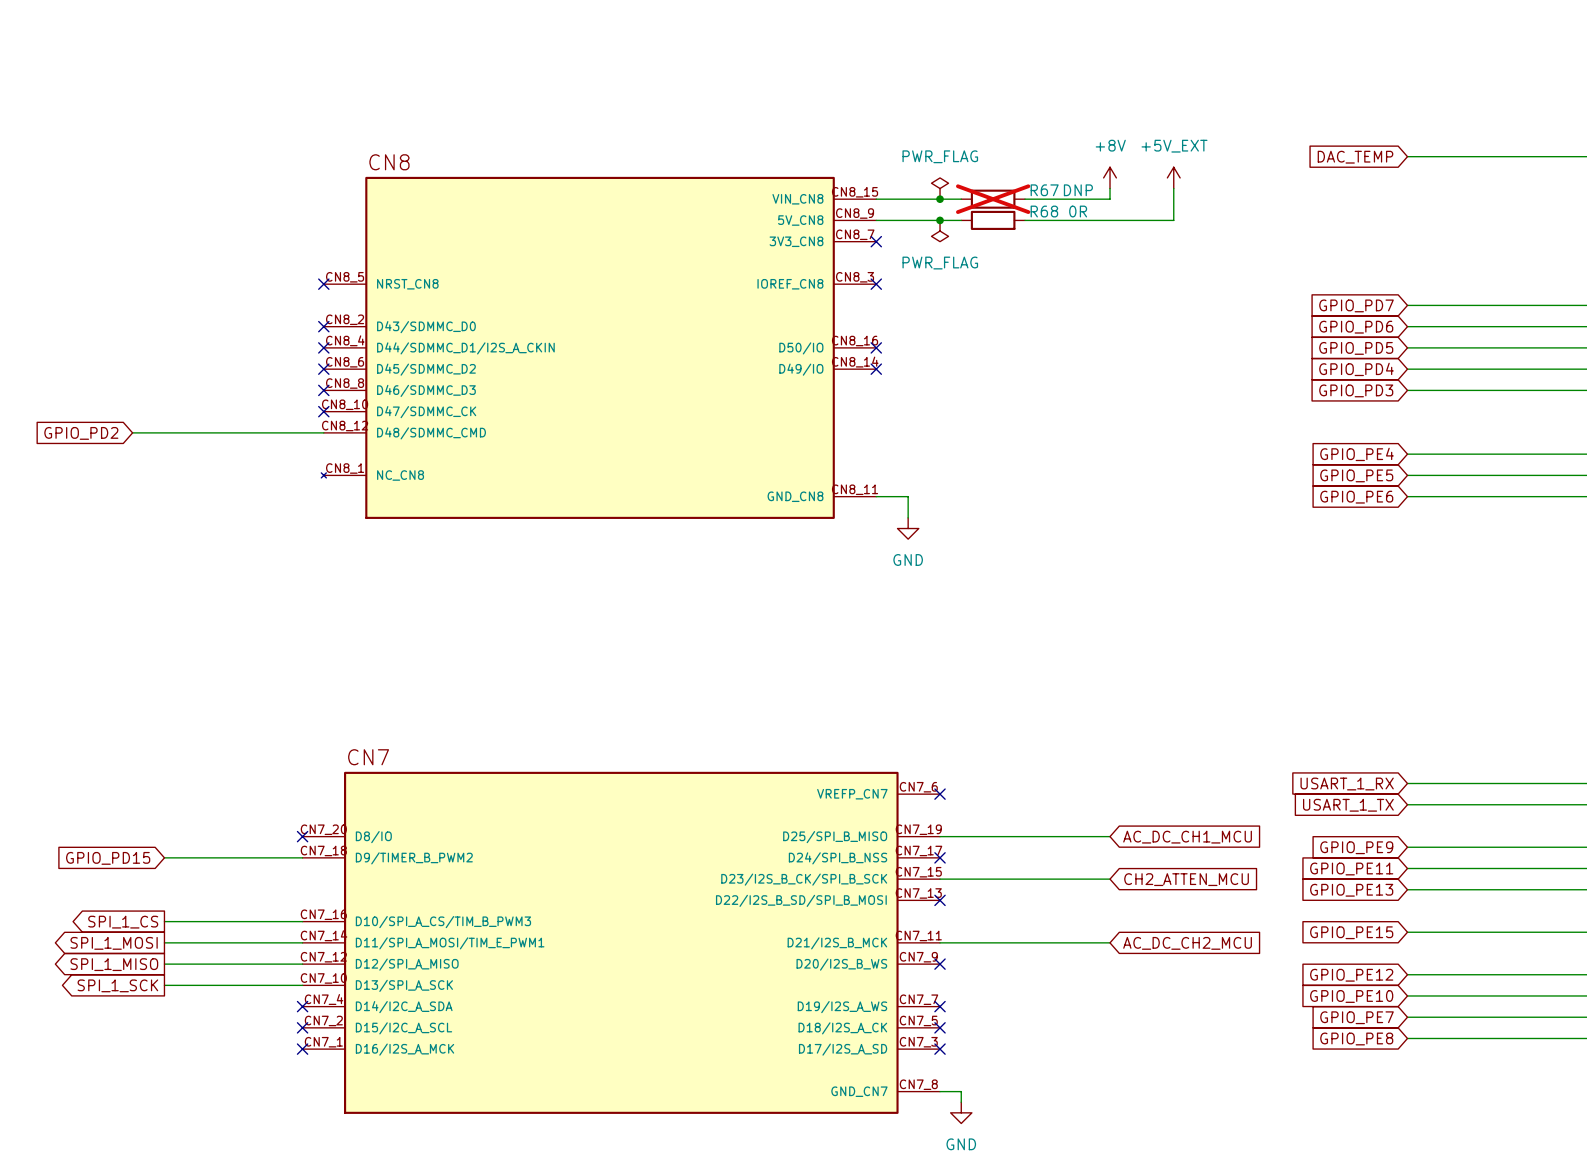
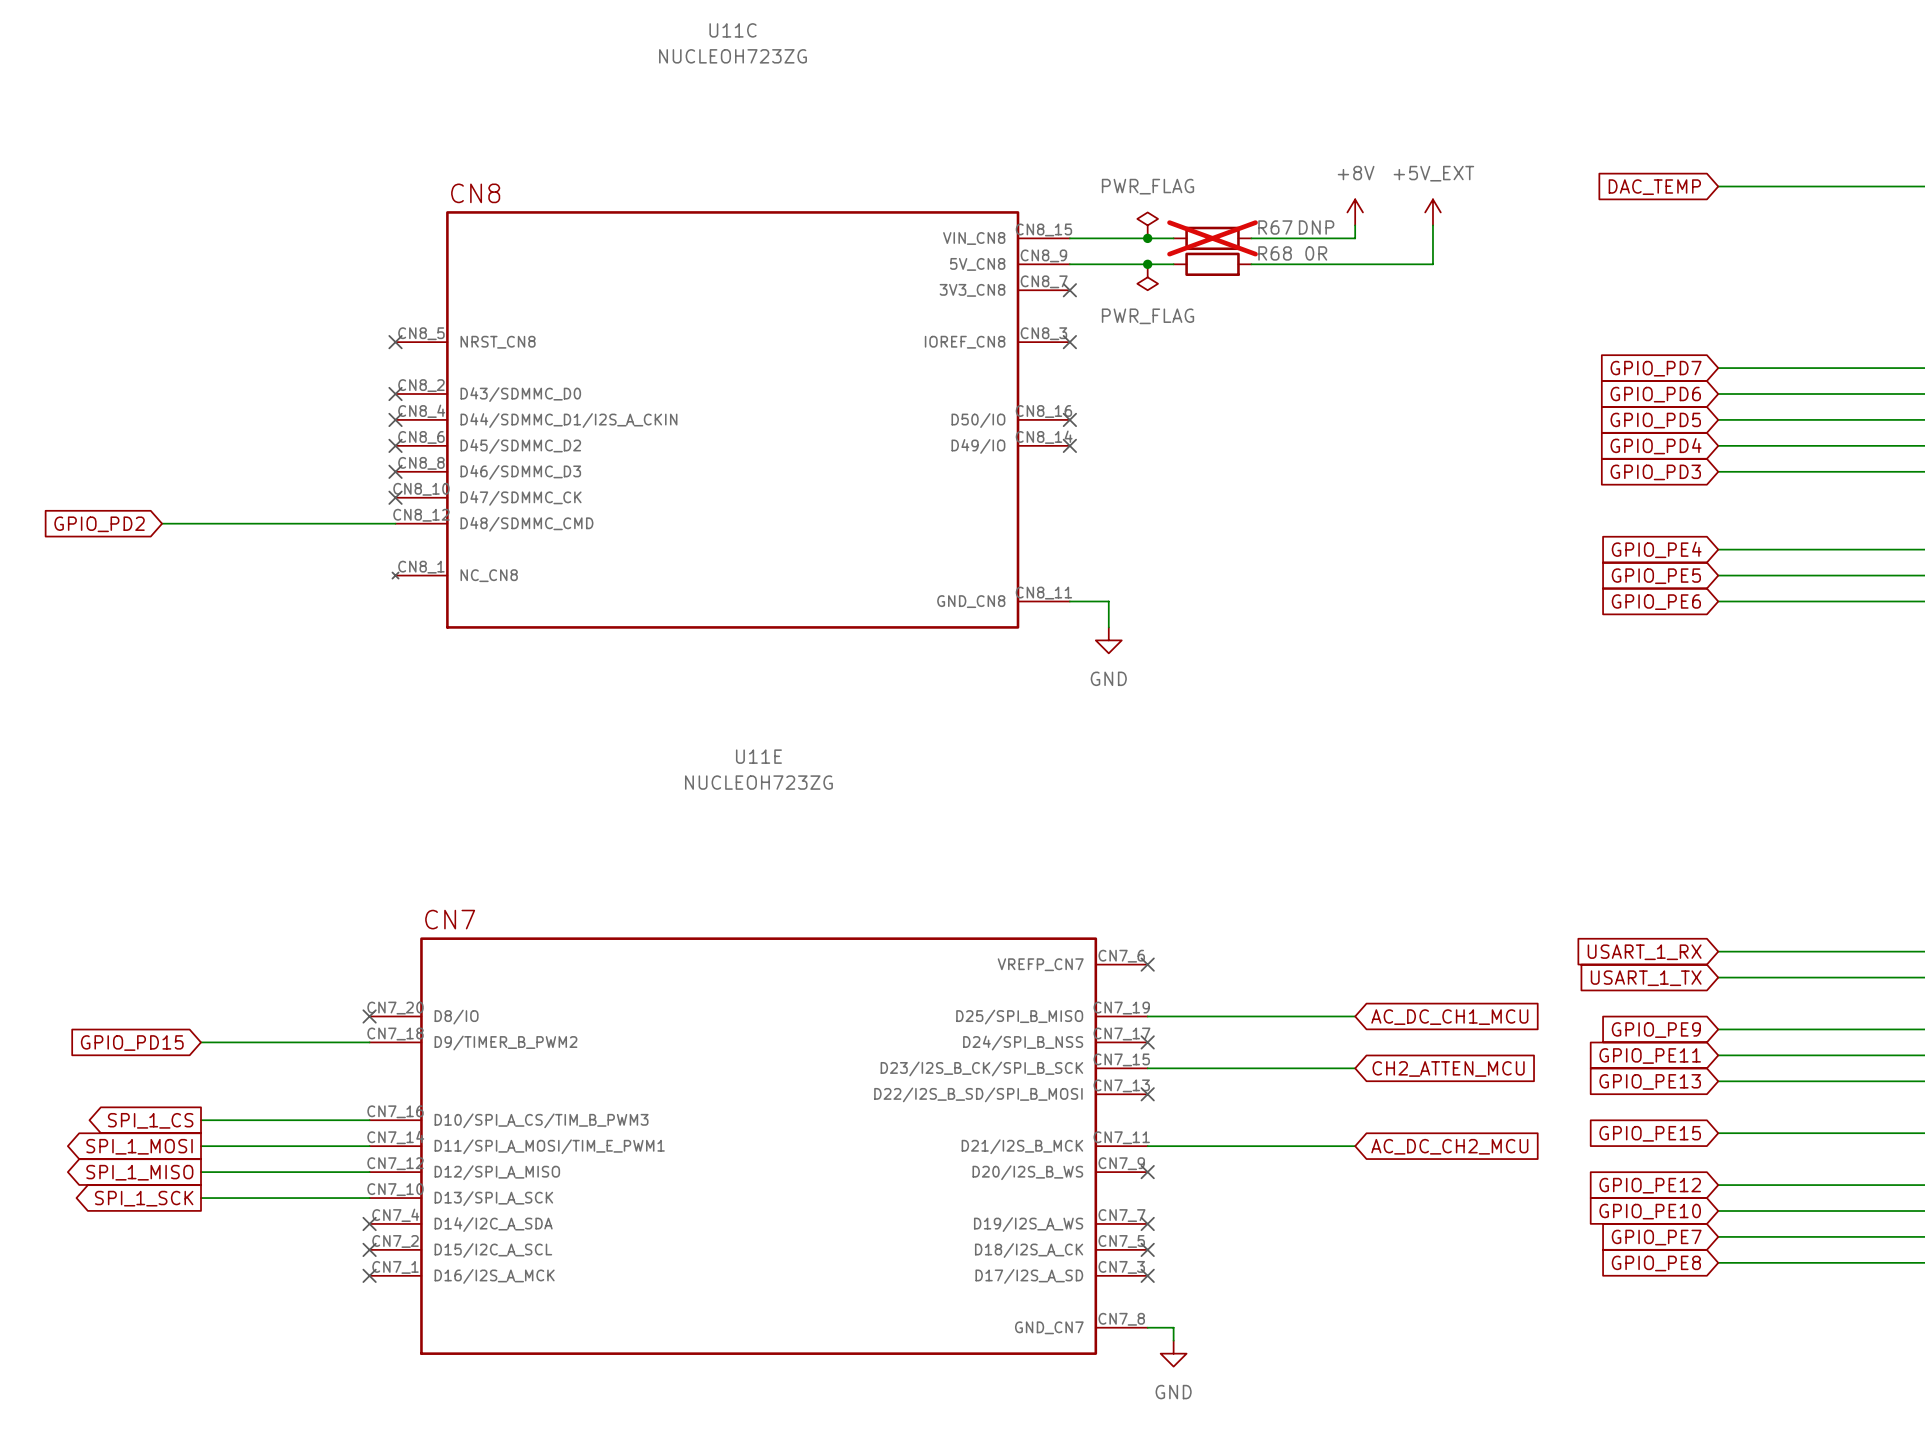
U11C name: none -> U11C (733, 30)
U11C value: none -> NUCLEOH723ZG (733, 56)
U11E name: none -> U11E (758, 756)
U11E value: none -> NUCLEOH723ZG (758, 782)

